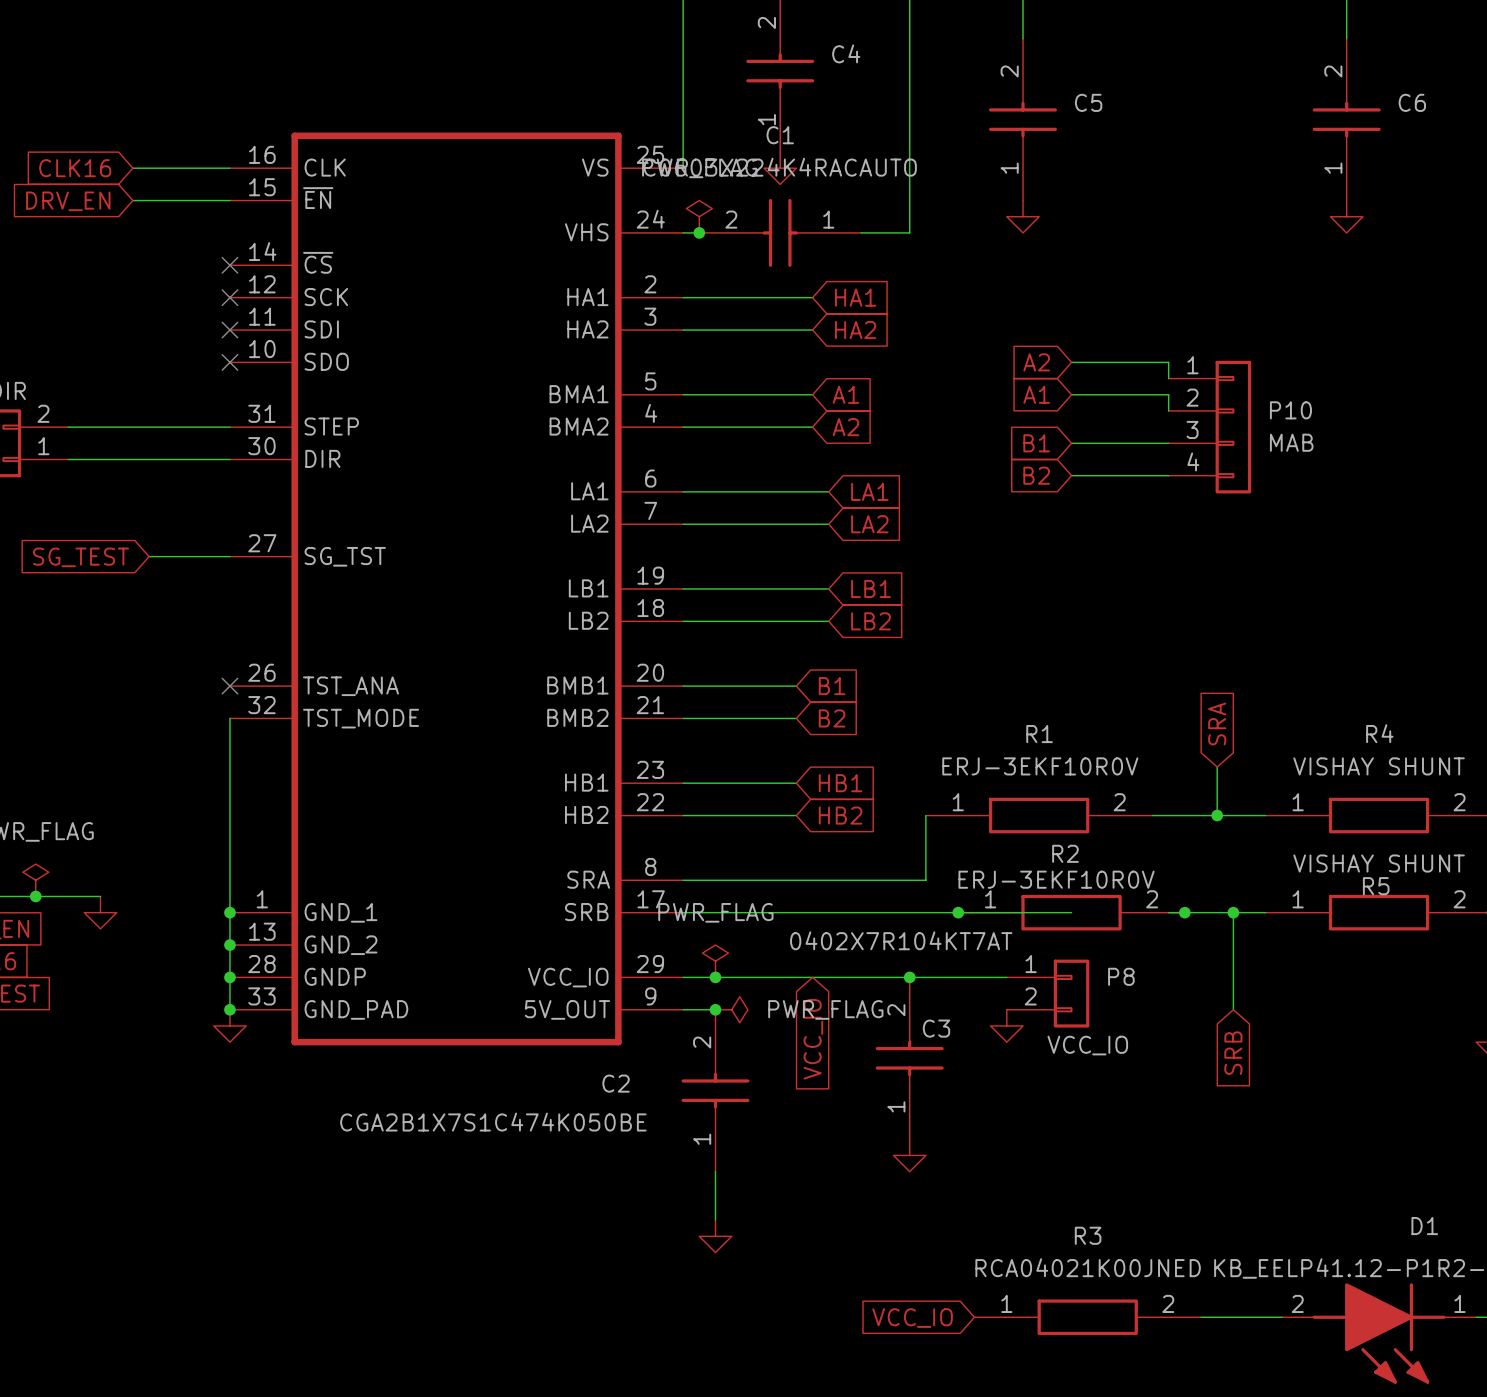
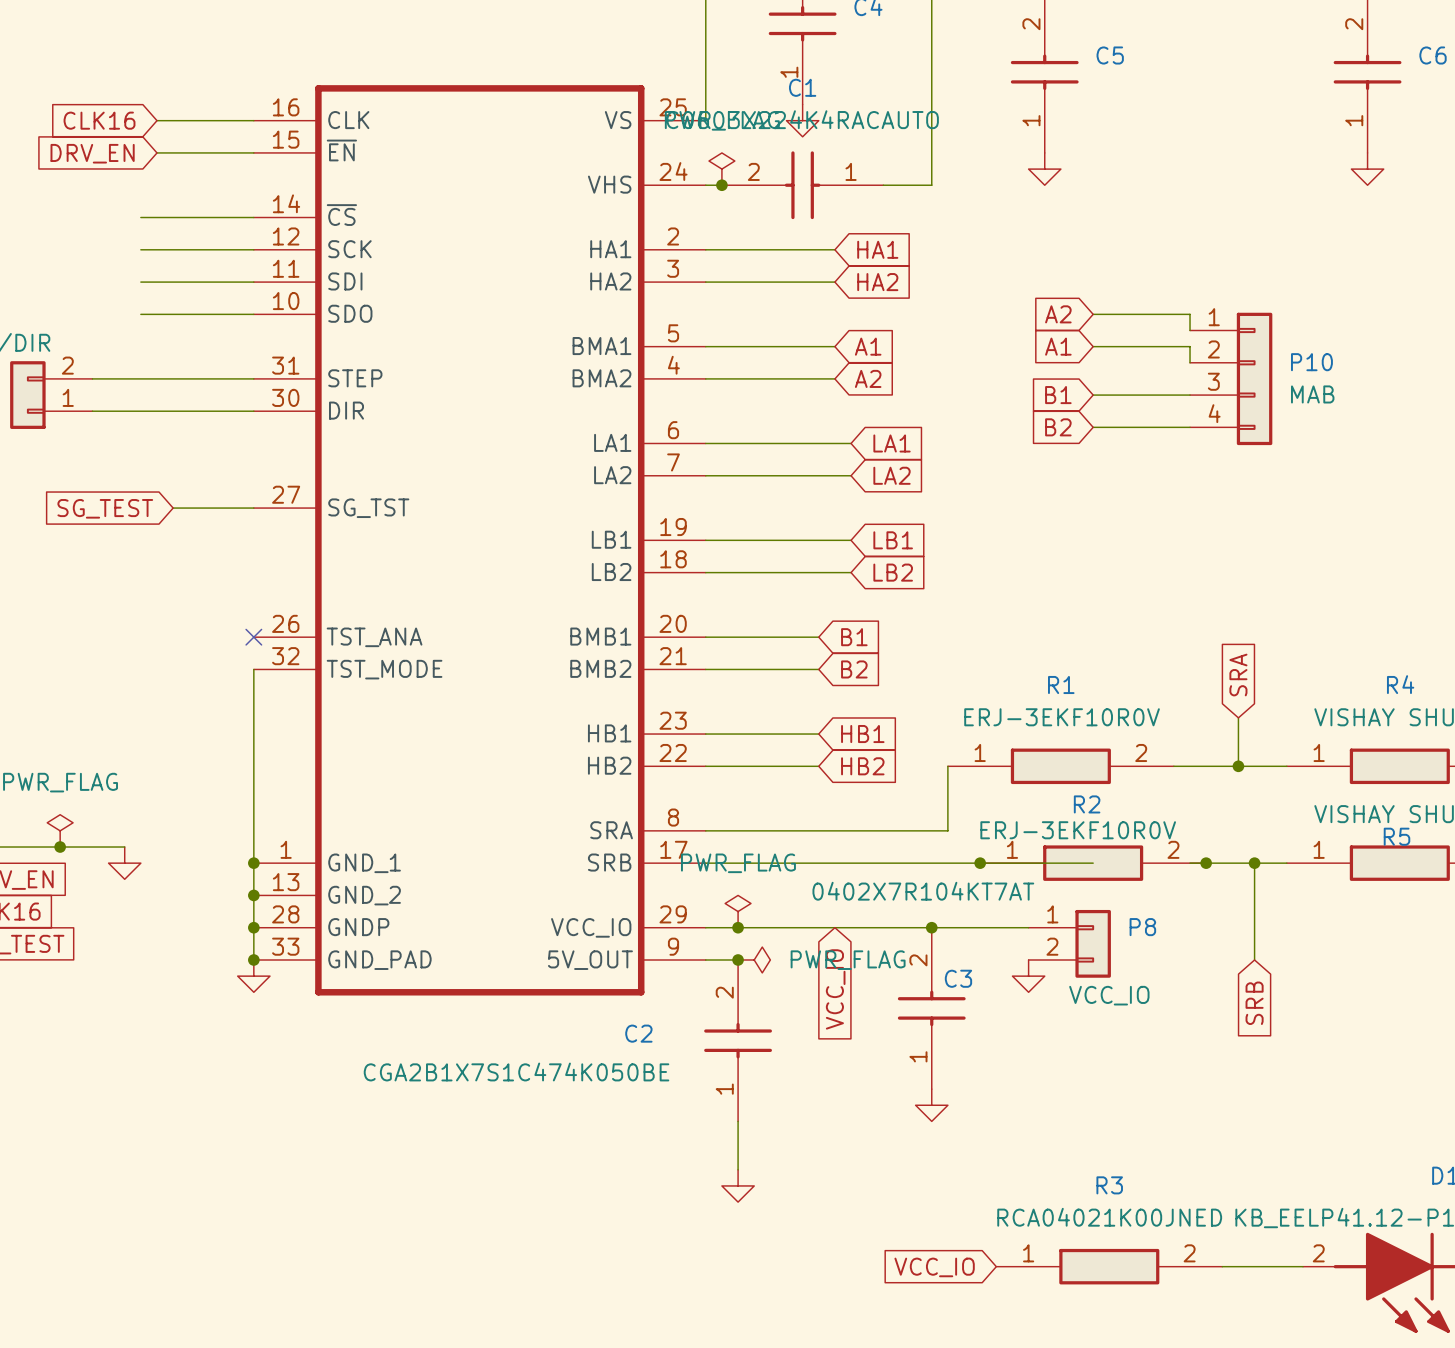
wire: none -> (140, 217) (253, 217)
no-connect mark: (229, 265) -> none
wire: none -> (140, 249) (253, 249)
no-connect mark: (229, 297) -> none
wire: none -> (140, 282) (253, 282)
no-connect mark: (229, 330) -> none
wire: none -> (140, 314) (253, 314)
no-connect mark: (229, 362) -> none

